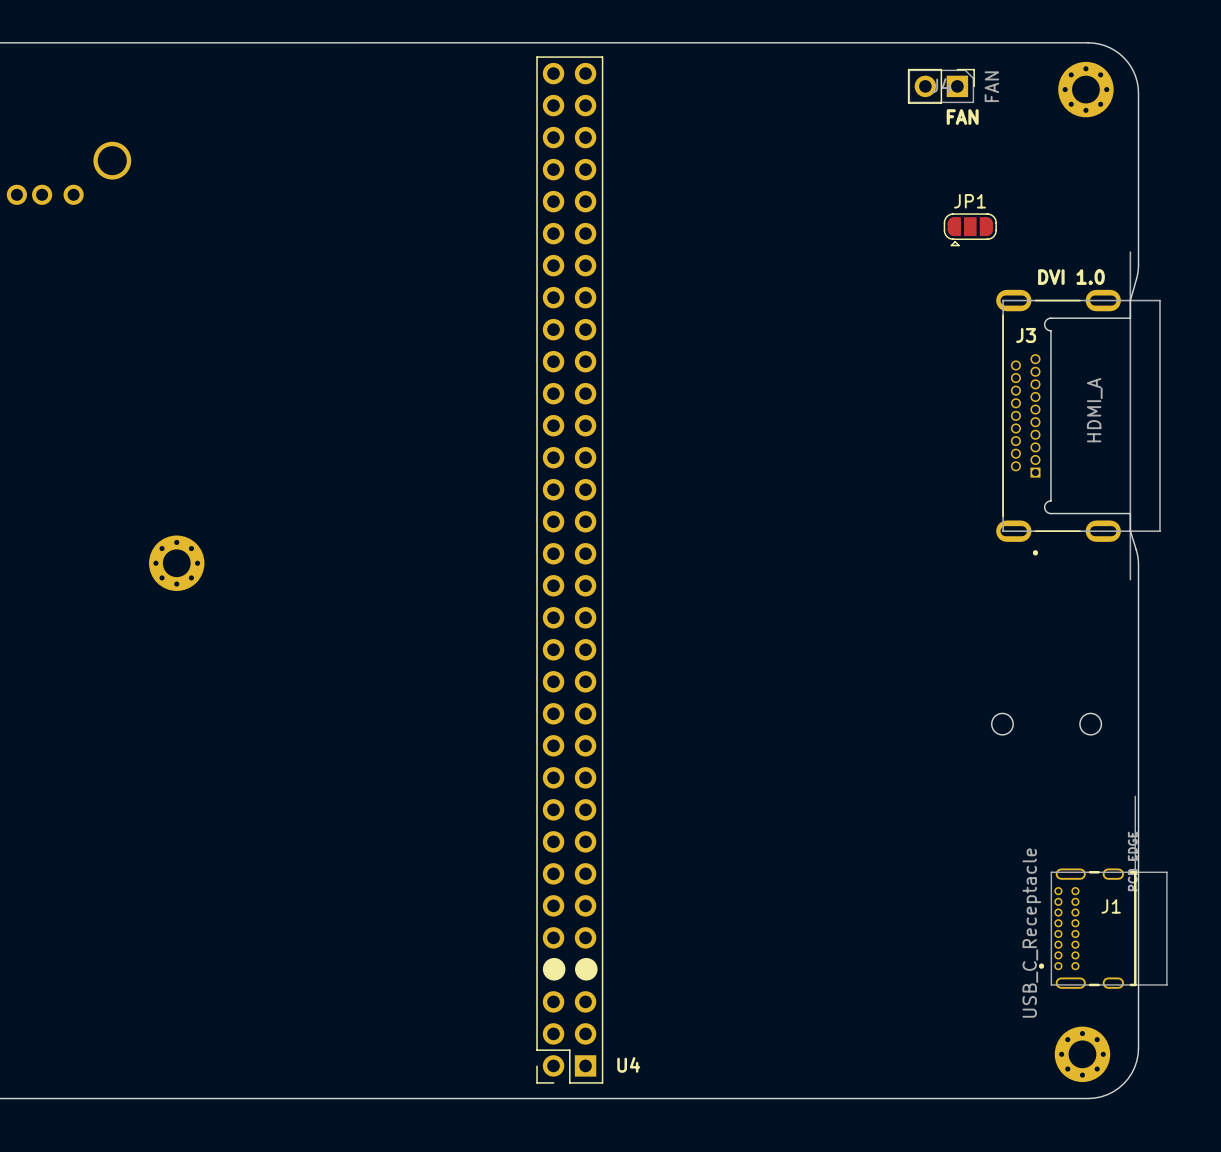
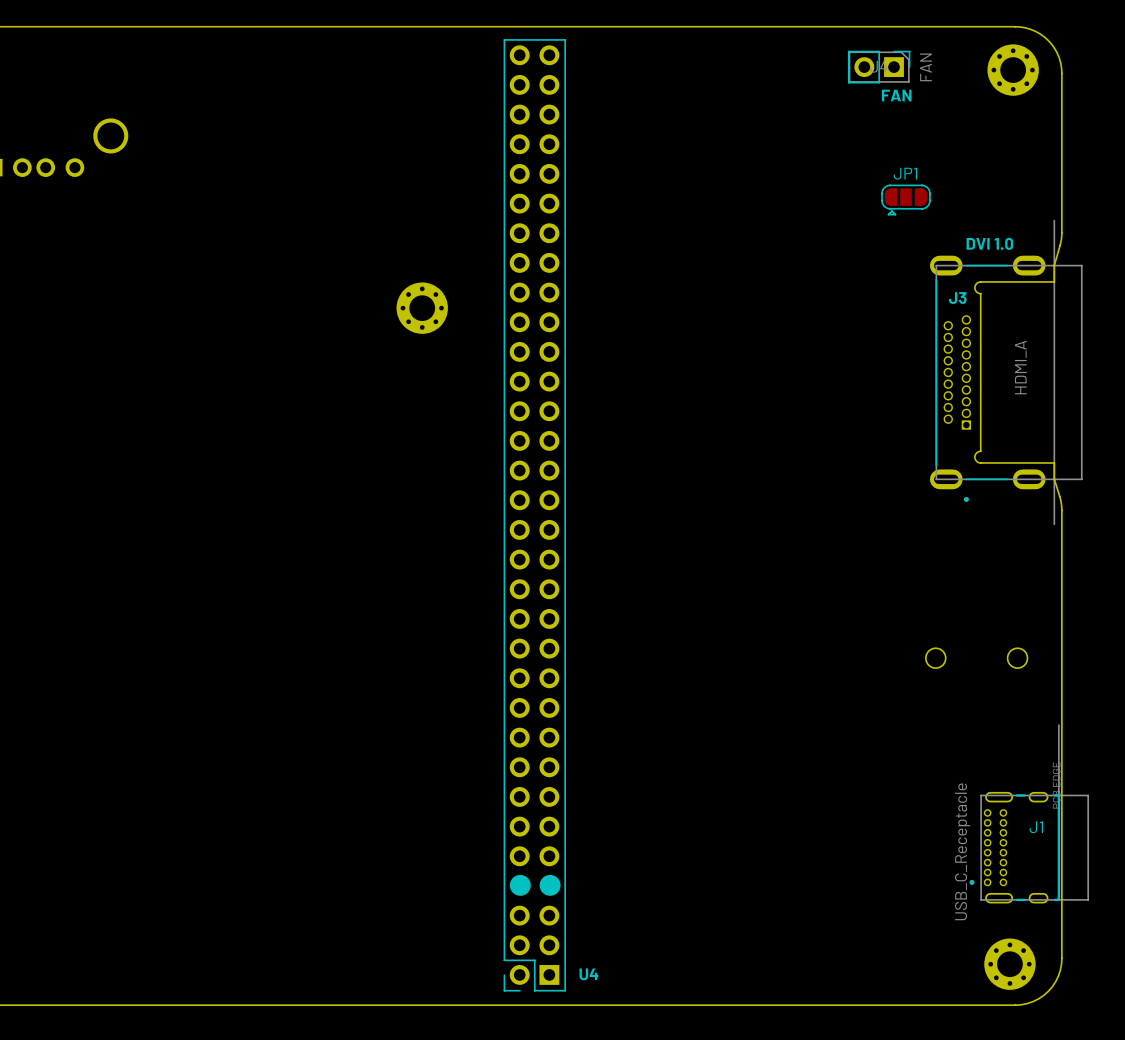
part: none -> (422, 308)
part: (176, 563) -> none

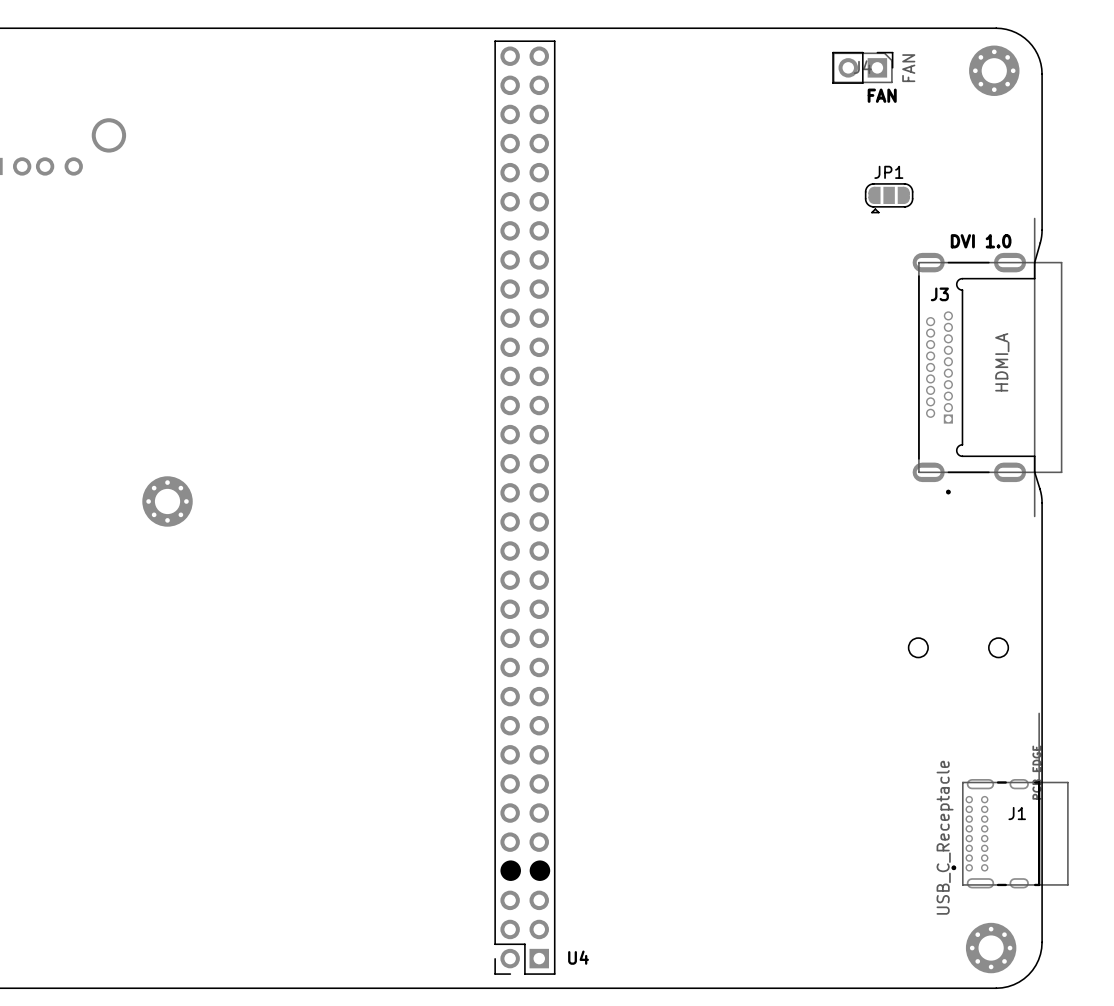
part: (422, 308) -> none
part: none -> (167, 501)

